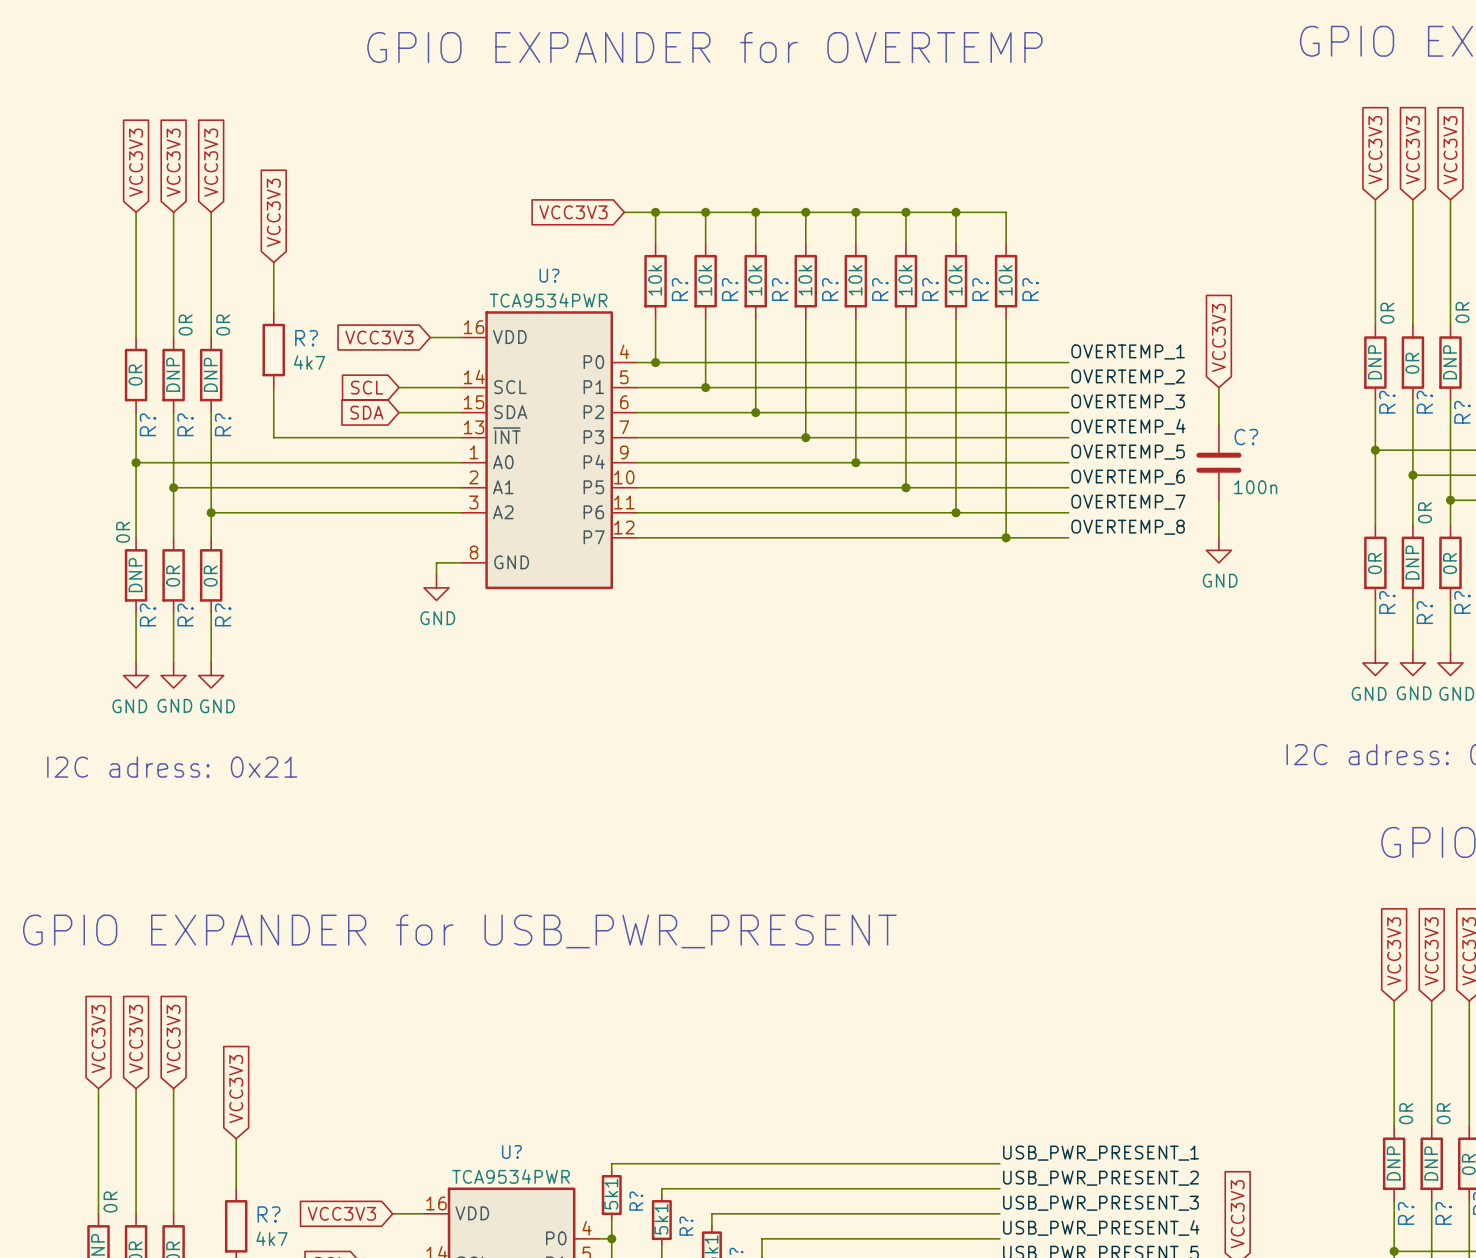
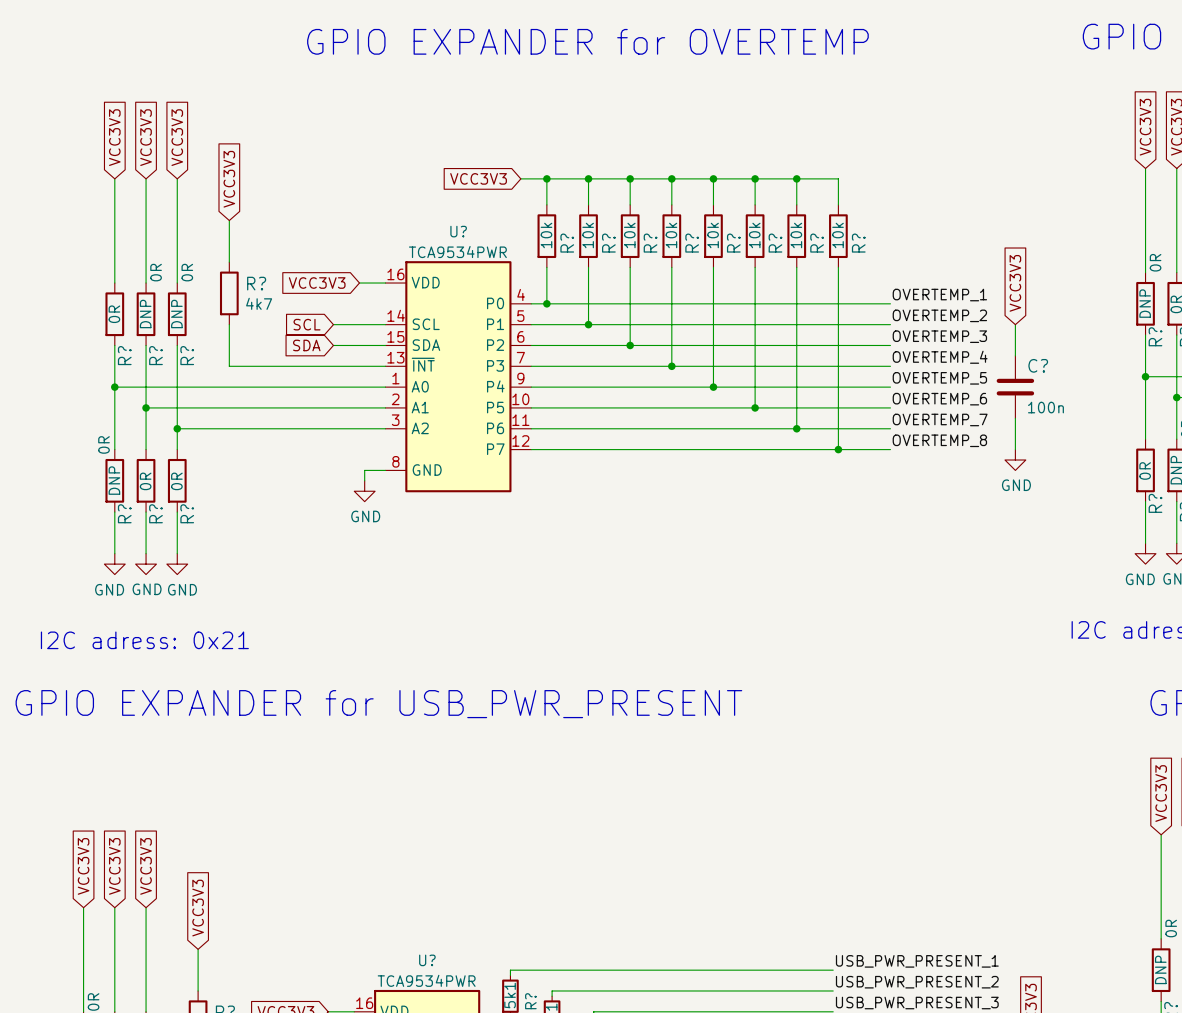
text position: GPIO EXPANDER for USB_PWR_PRESENT (459, 931) -> GPIO EXPANDER for USB_PWR_PRESENT (378, 704)

